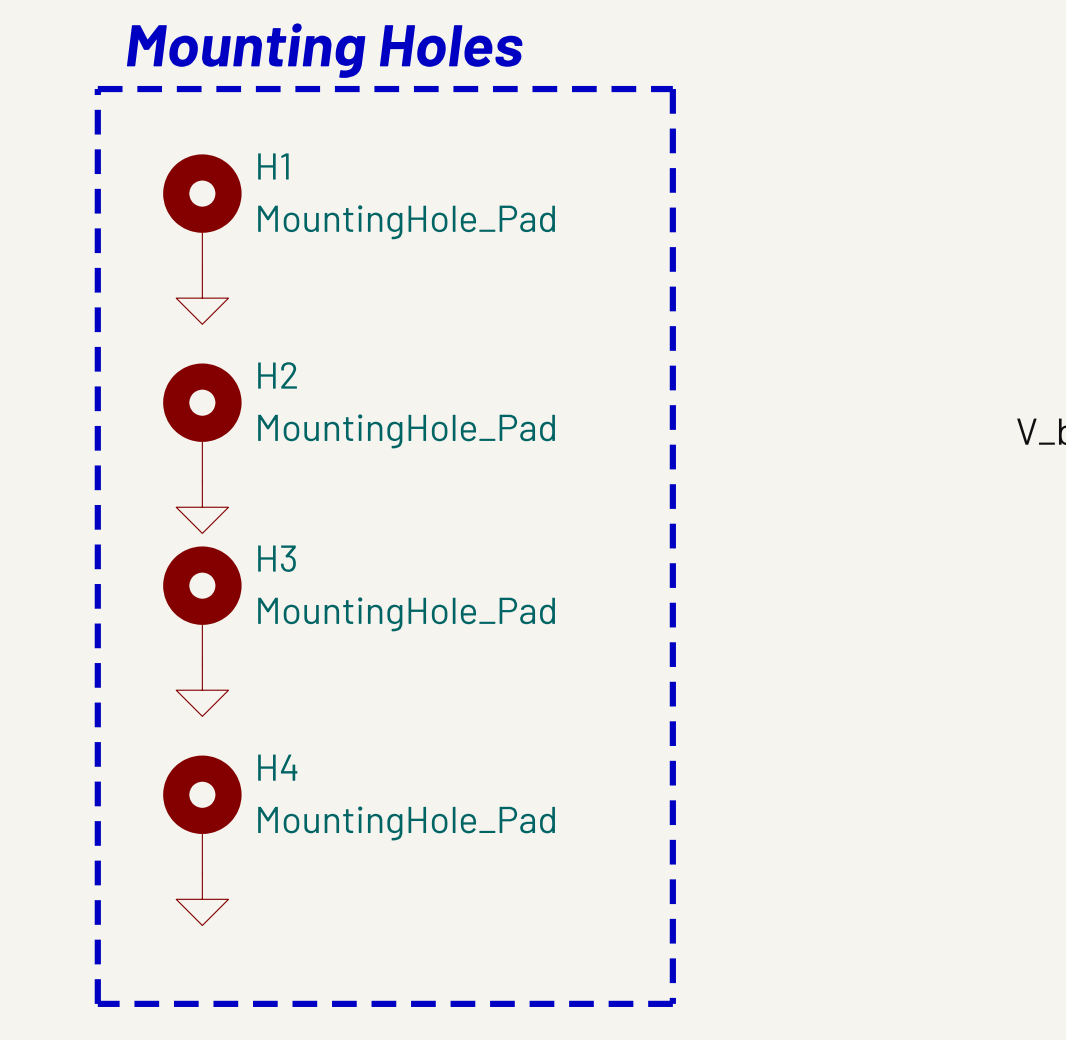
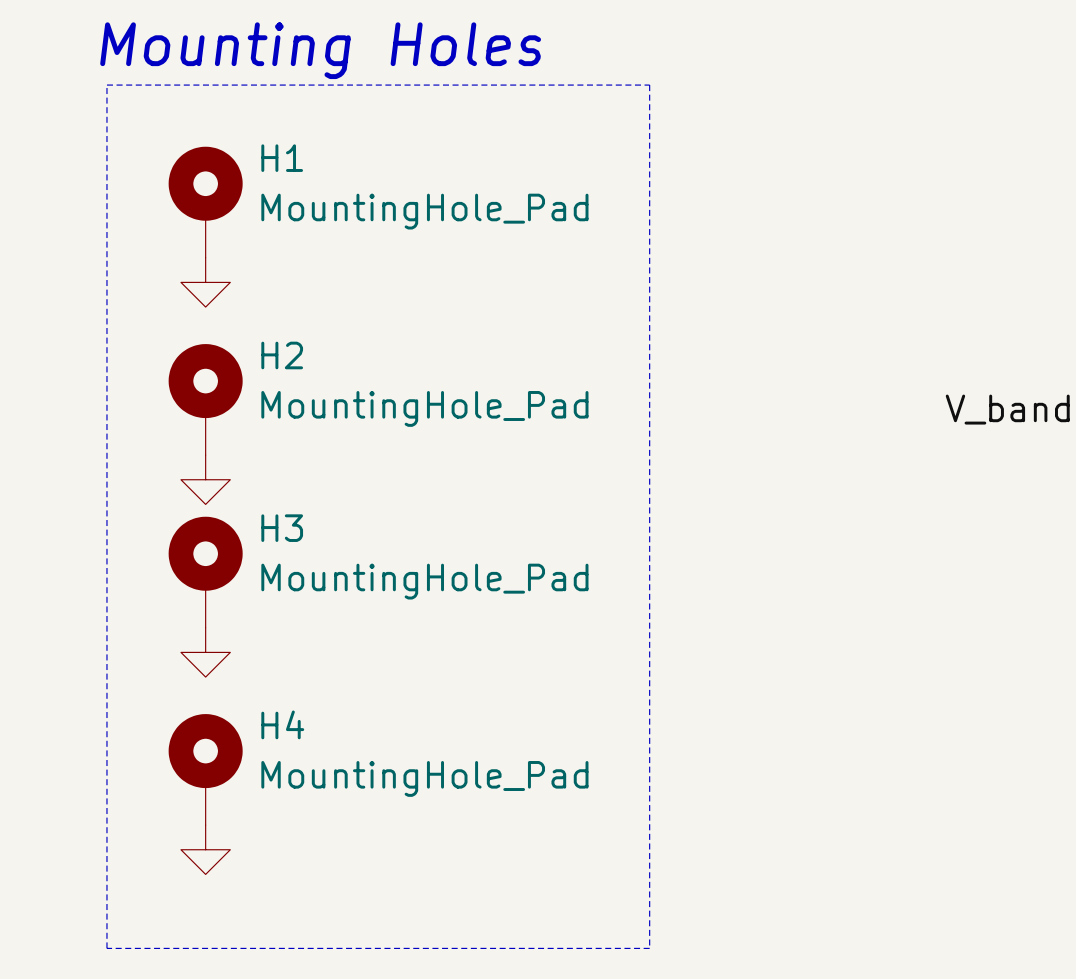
line width: thick (97, 89) (672, 89) (672, 1003) (97, 1003) (97, 89) -> thin (106, 85) (649, 85) (649, 948) (106, 948) (106, 85)

